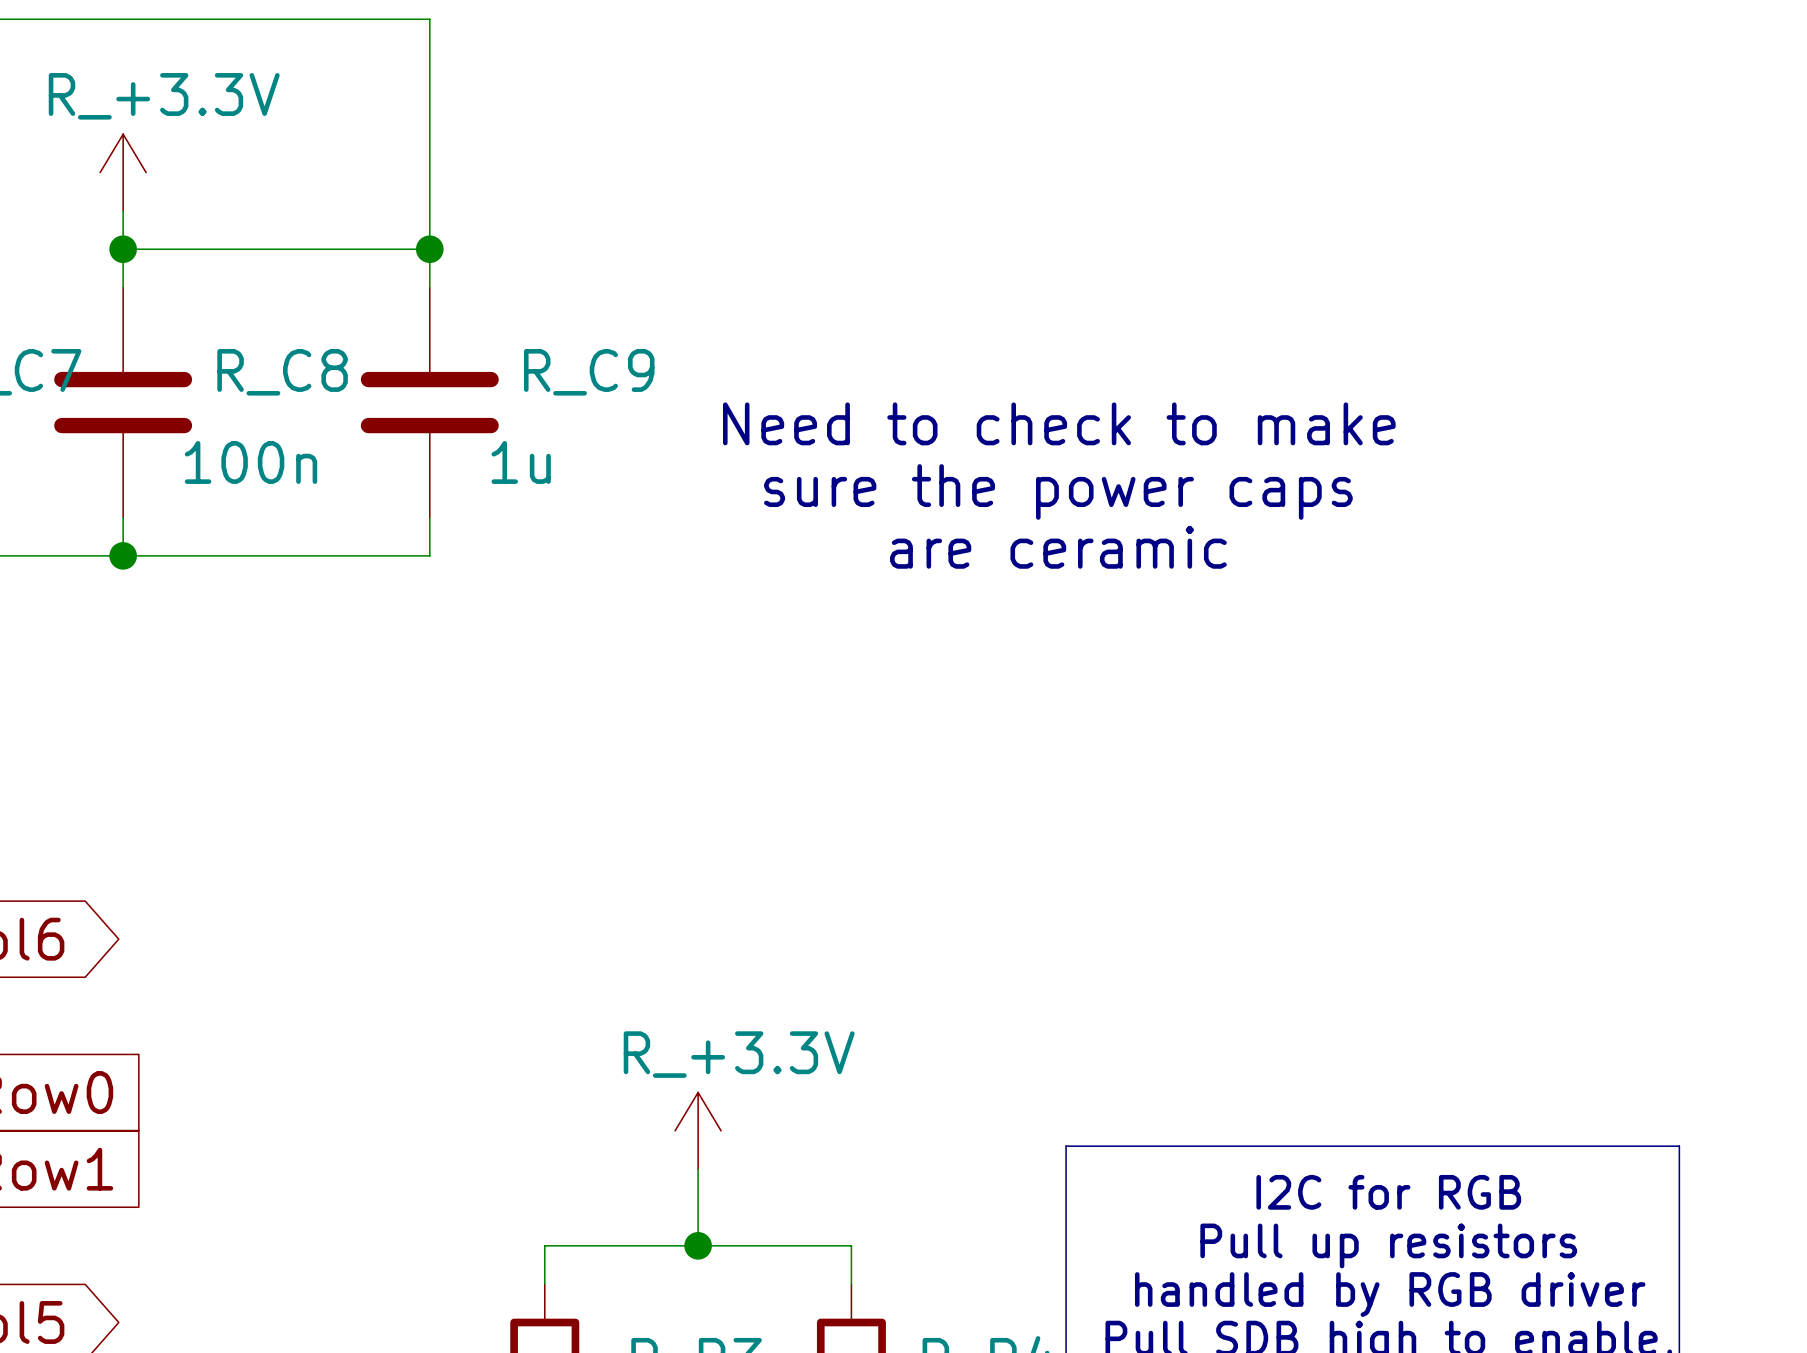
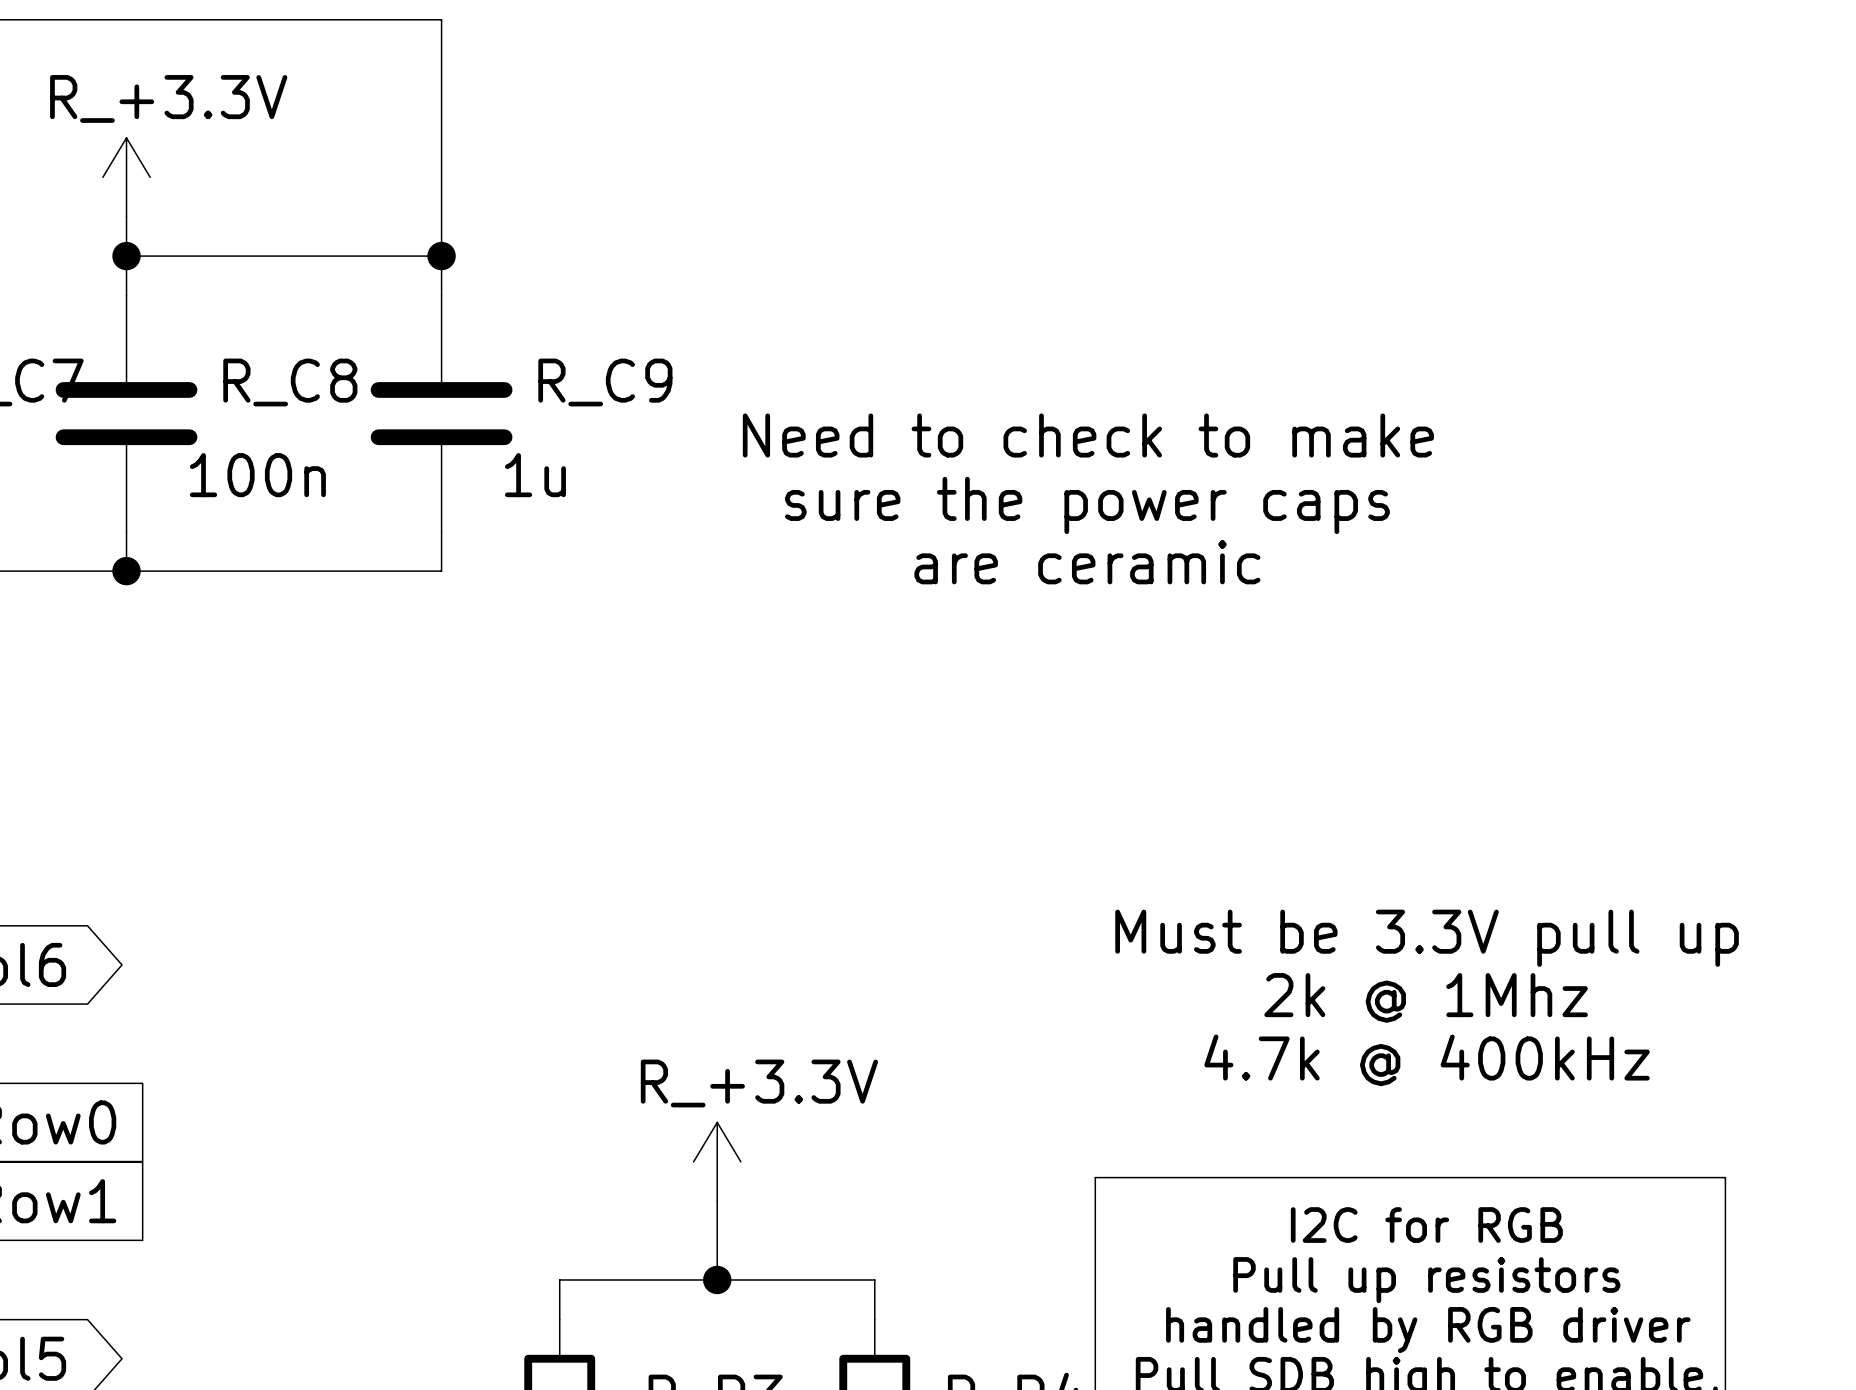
text: none -> Must be 3.3V pull up (1427, 938)
text: none -> 2k @ 1Mhz (1426, 997)
text: none -> 4.7k @ 400kHz (1427, 1060)

